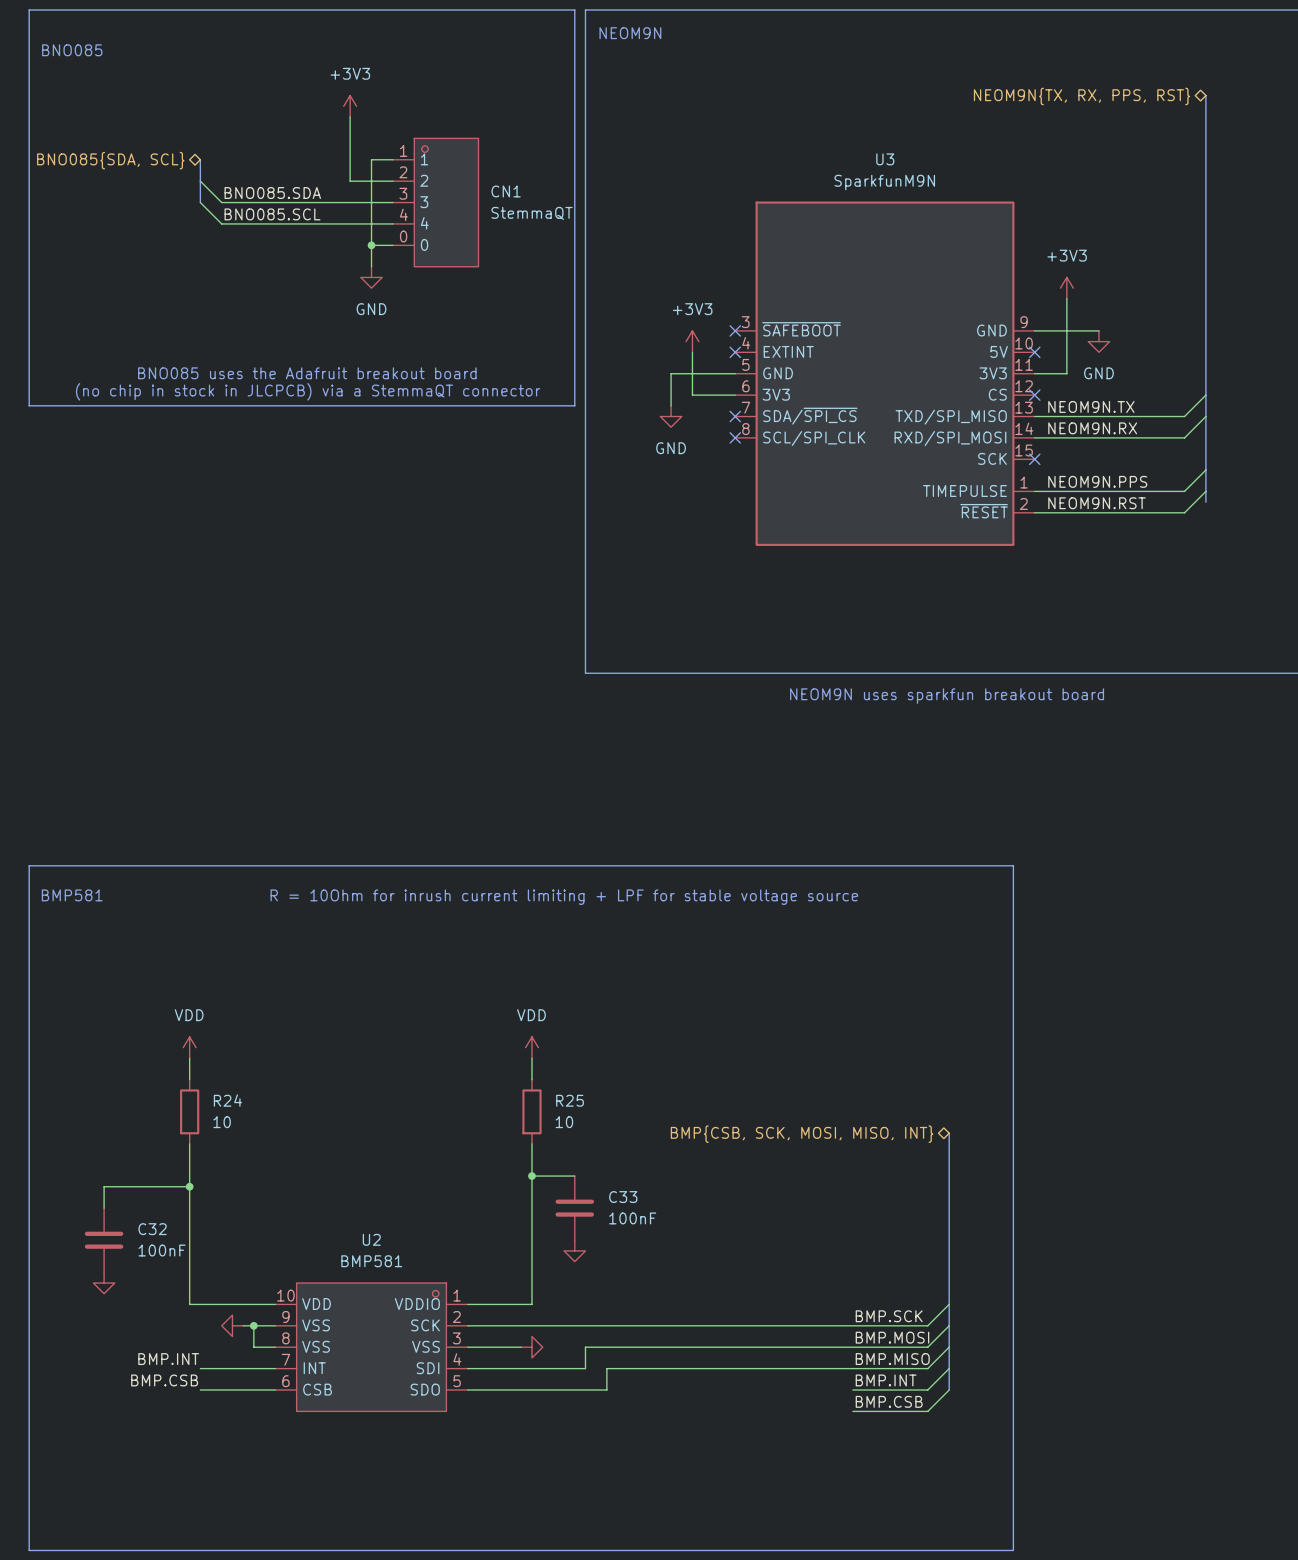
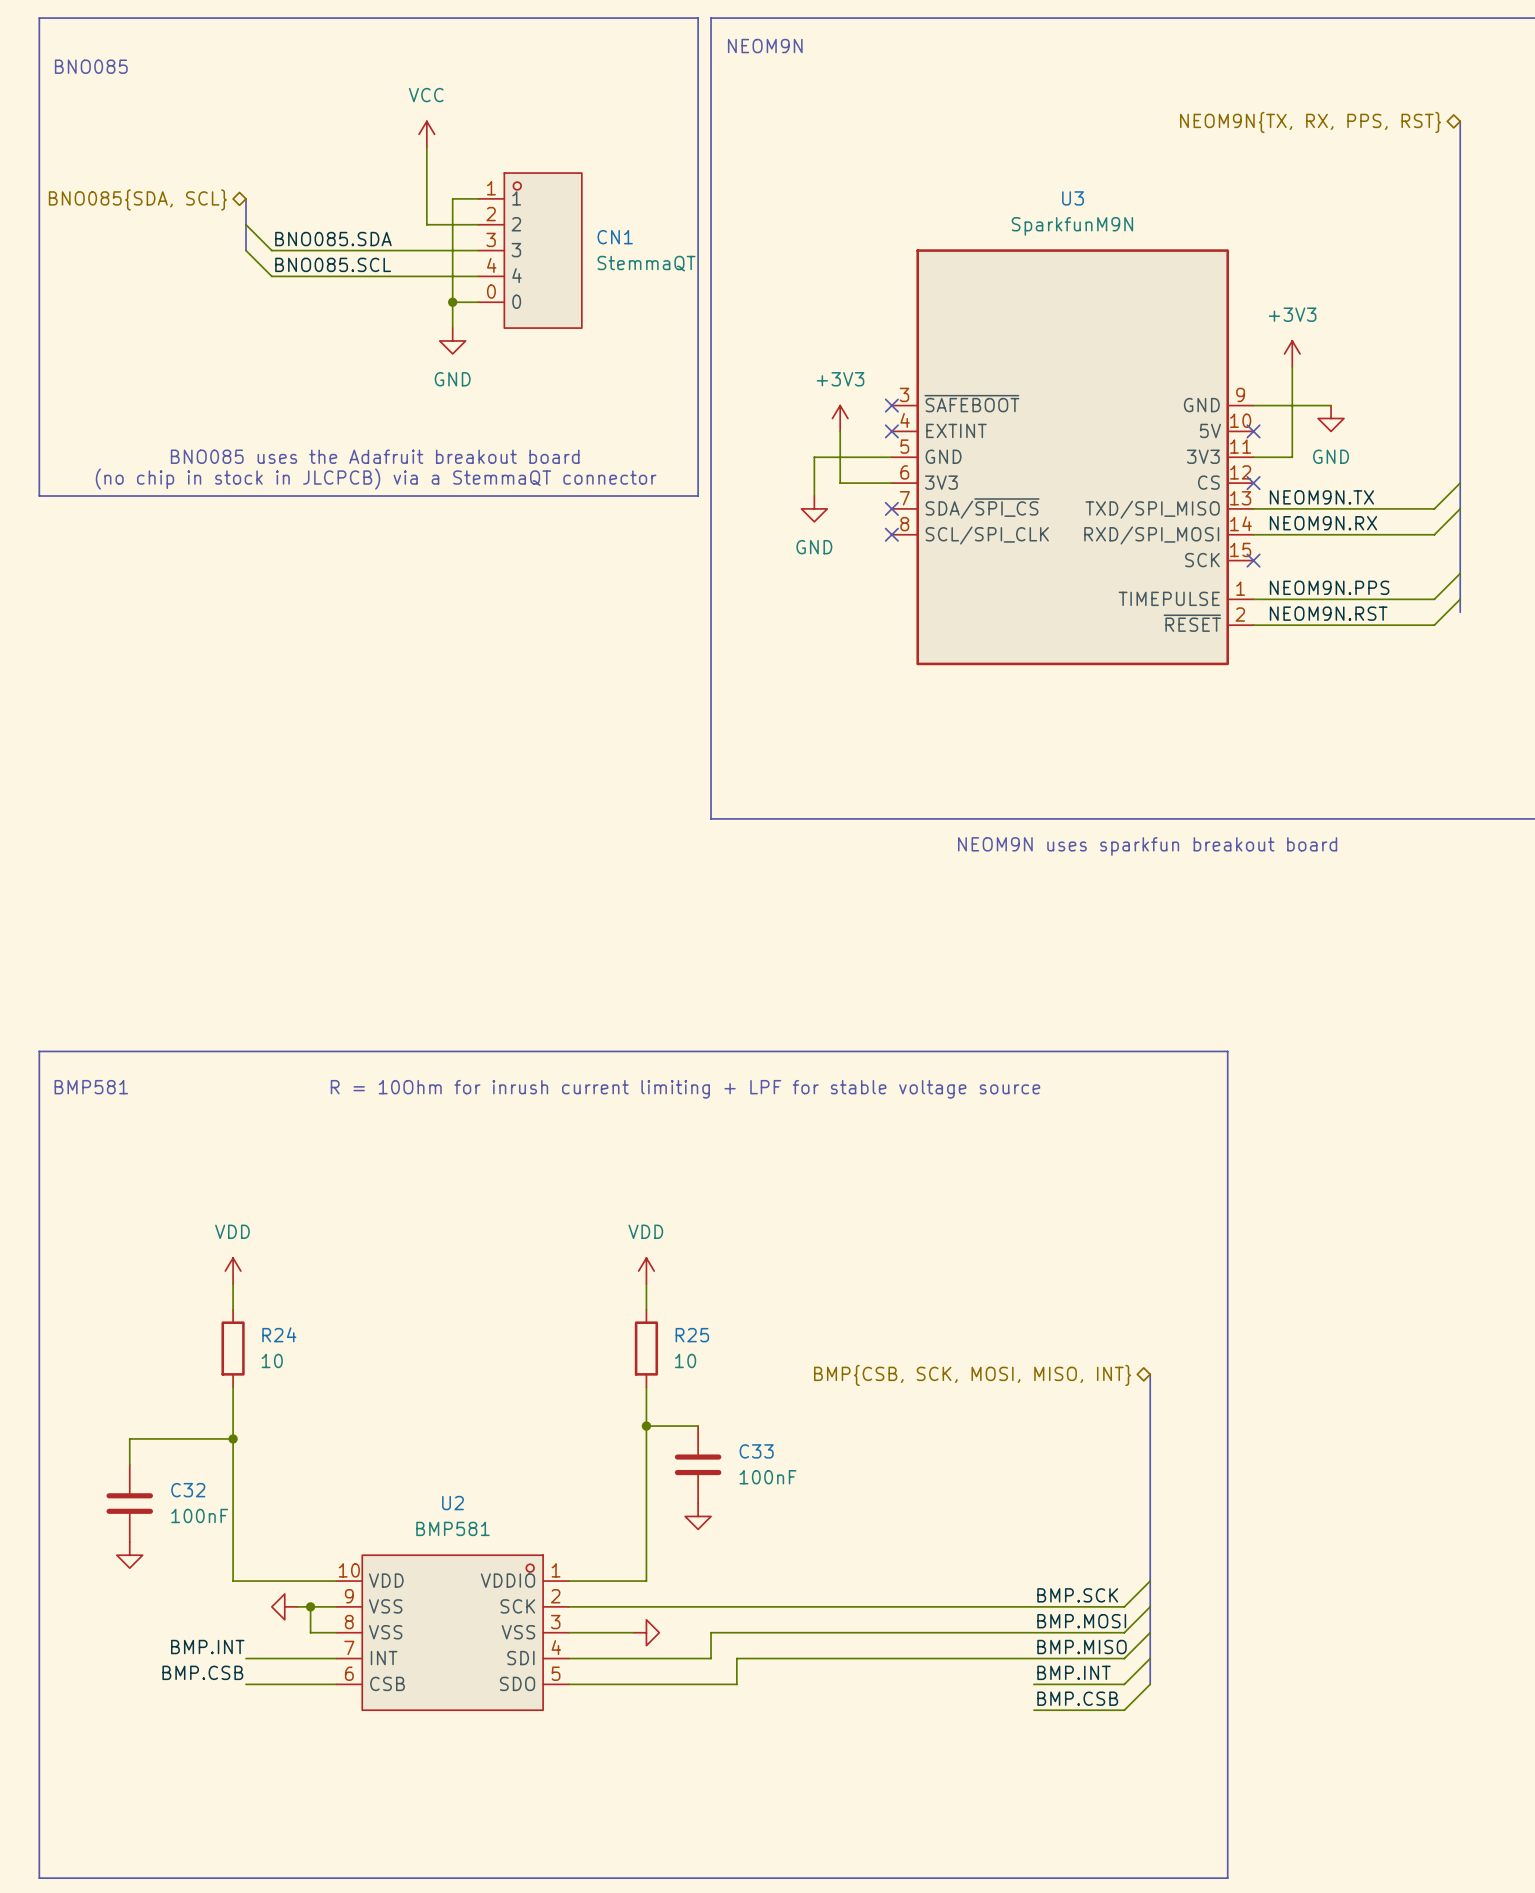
power symbol: +3V3 (350, 106) -> VCC (426, 134)

